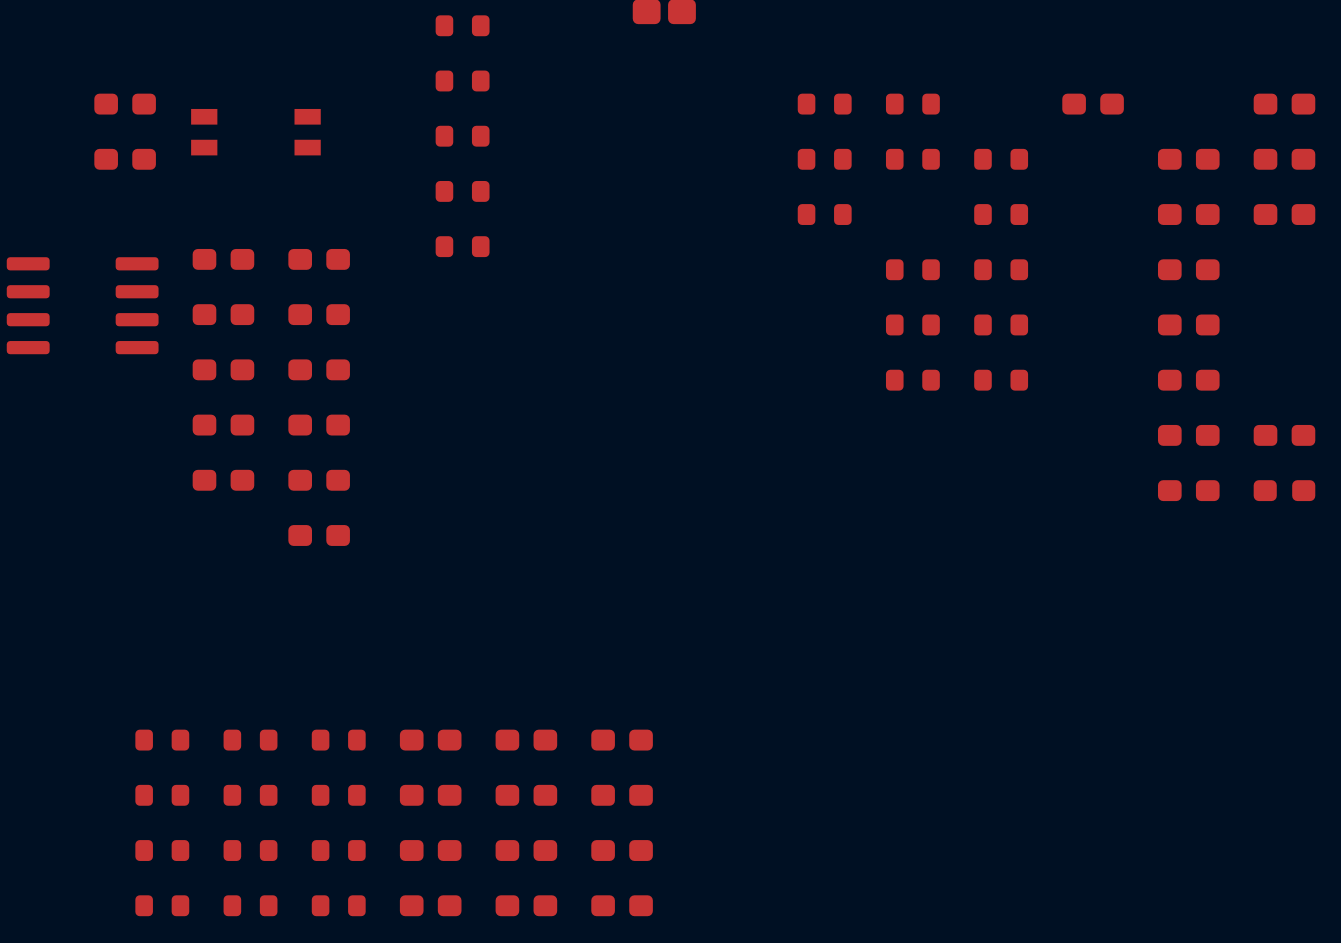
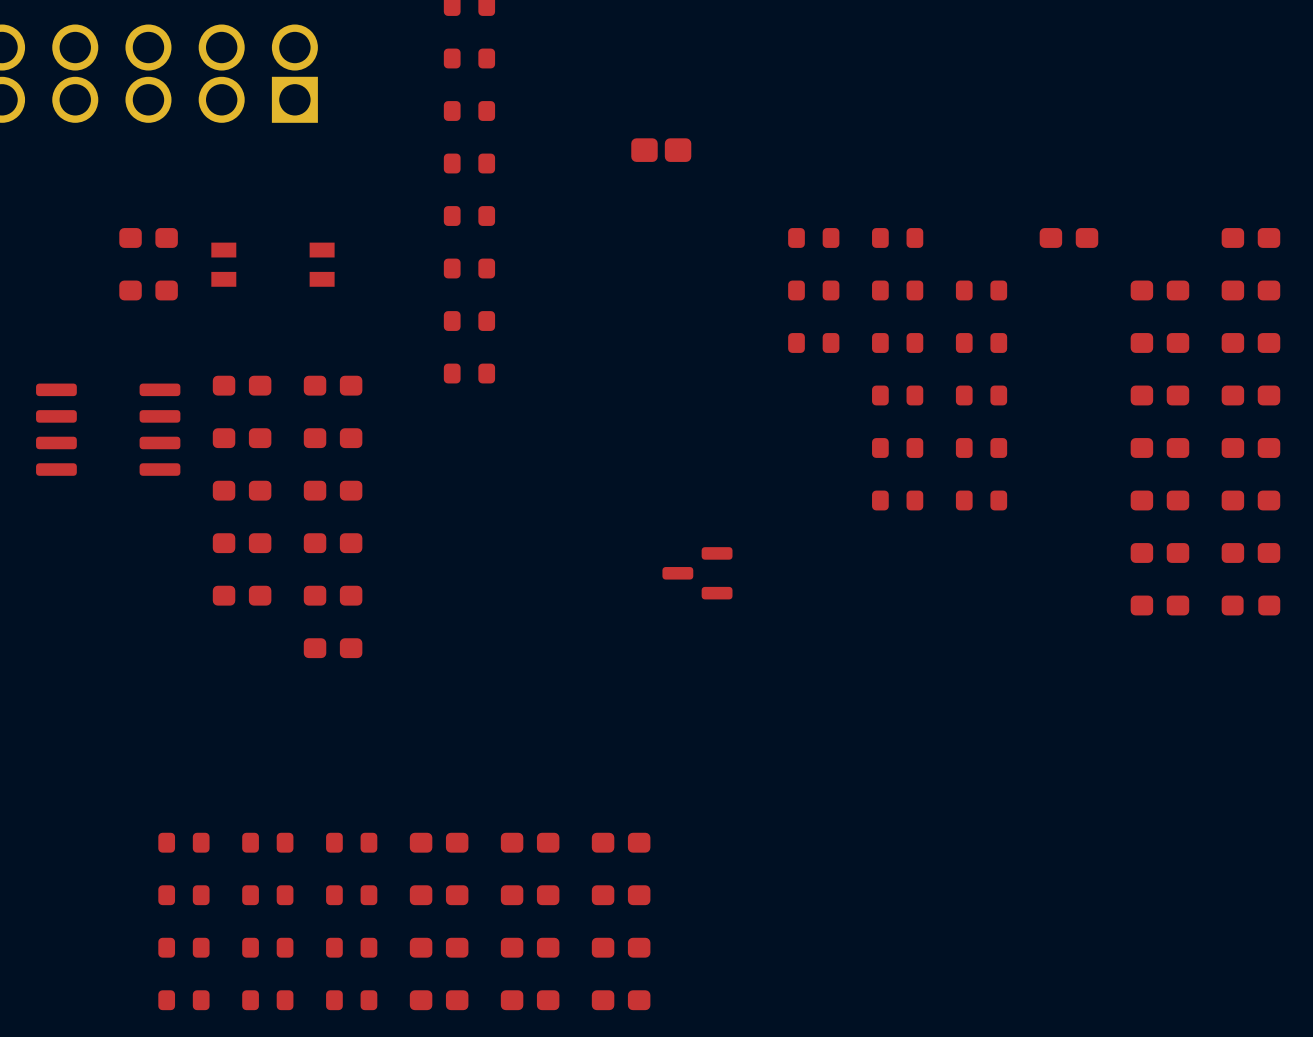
part: none -> (897, 342)
part: none -> (1250, 395)
part: none -> (1250, 447)
part: none -> (1250, 500)
part: none -> (697, 573)

